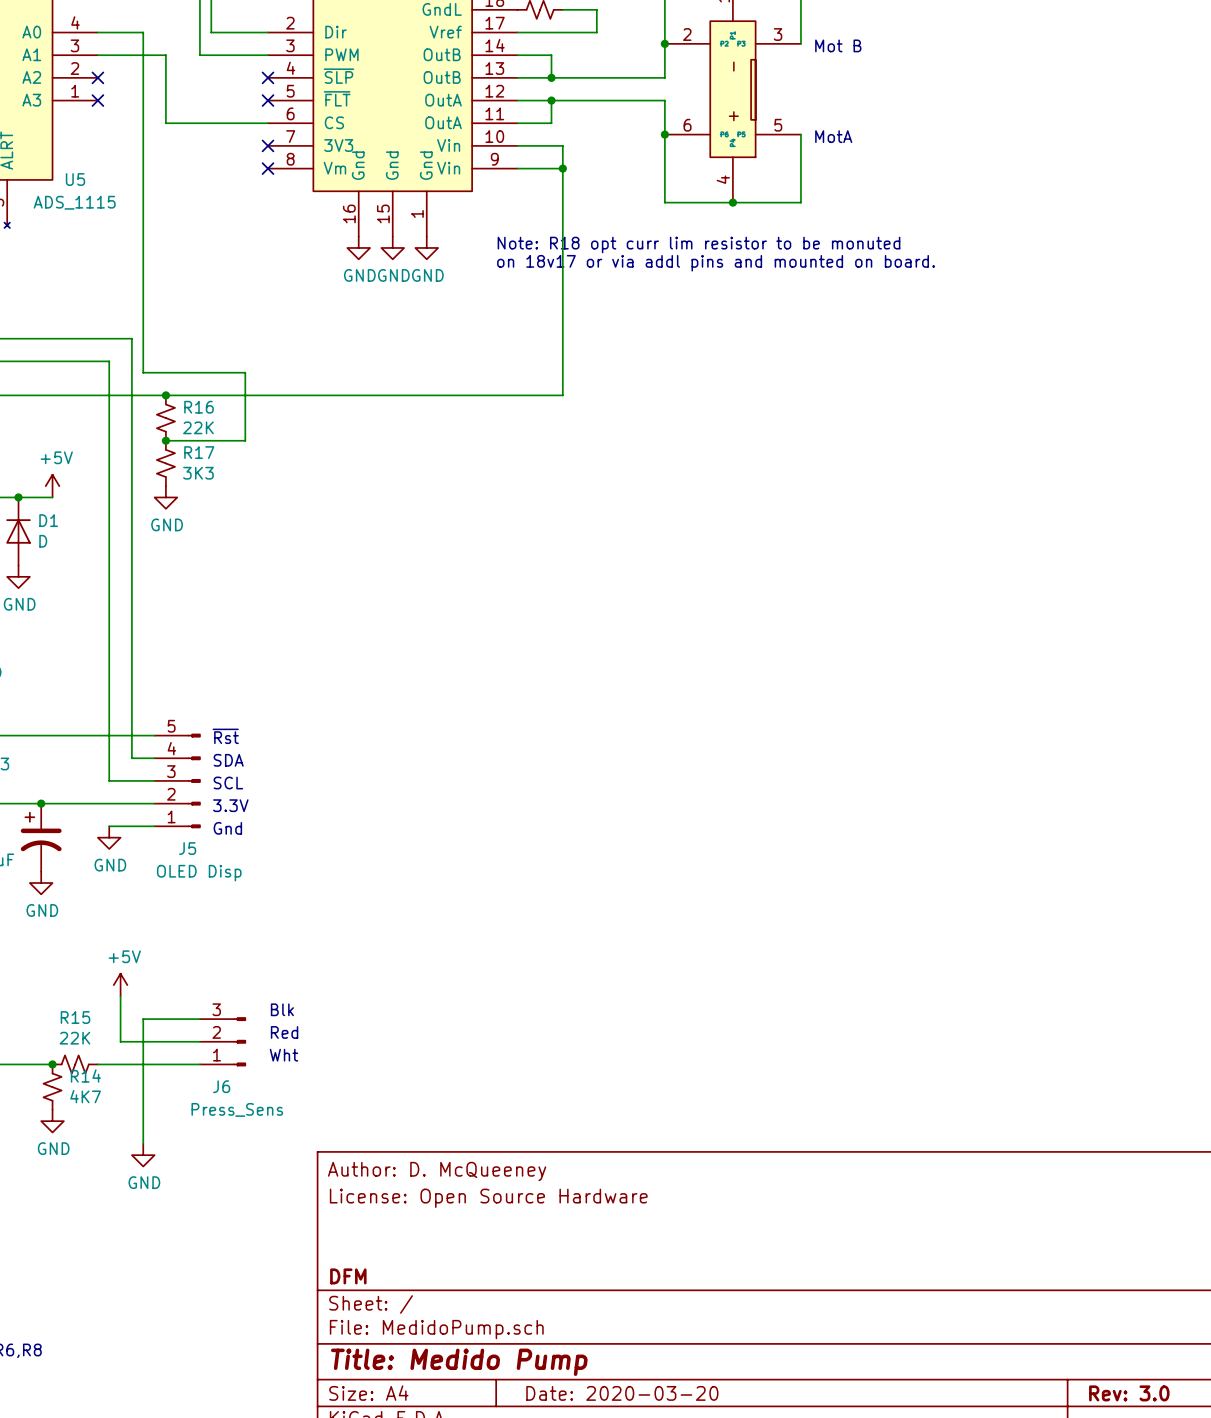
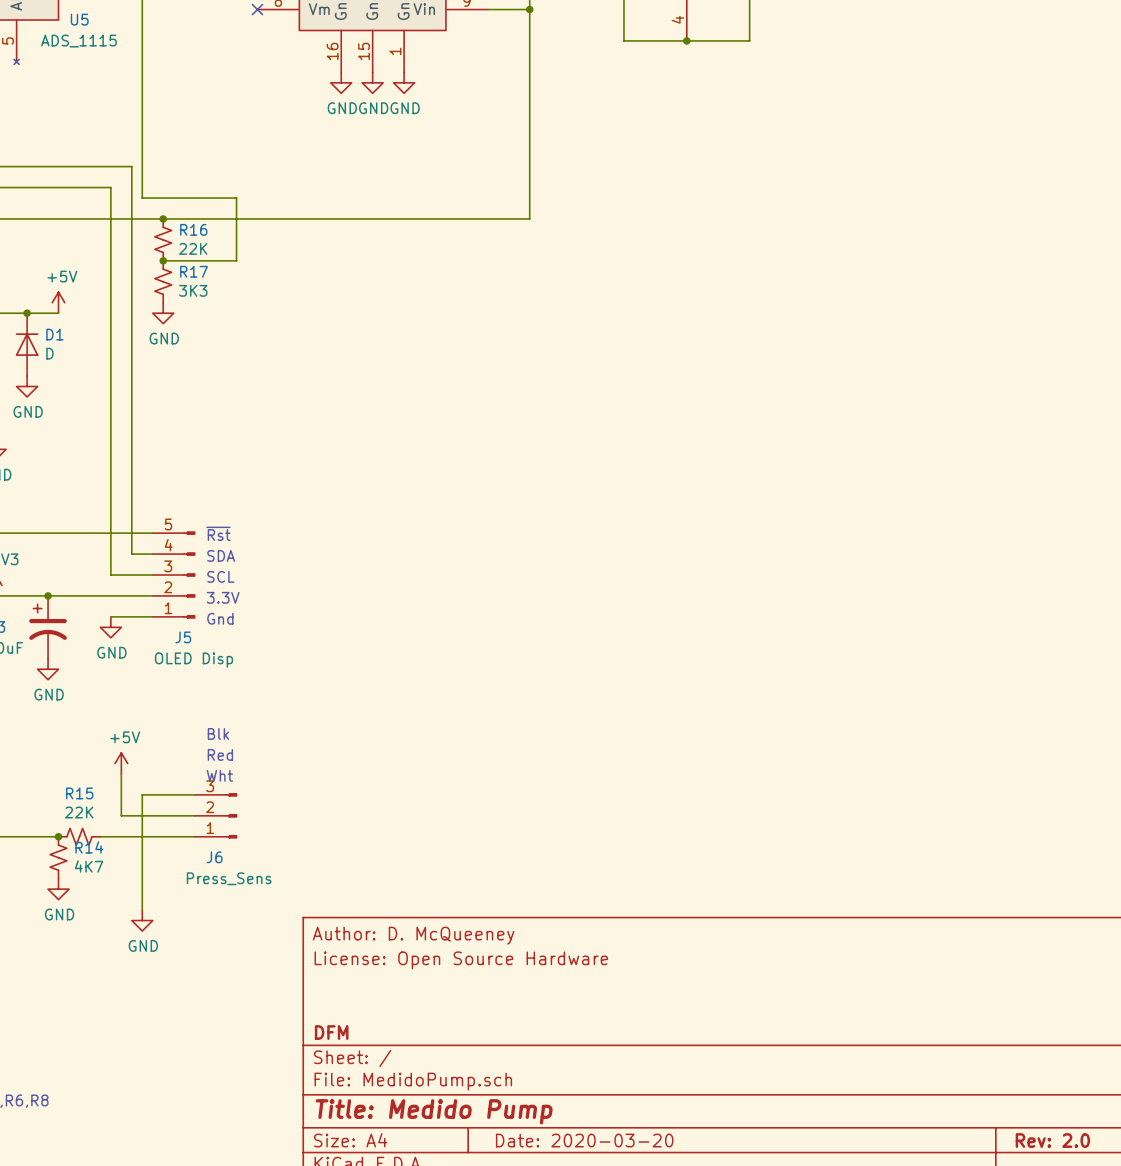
text: Note: R18 opt curr lim resistor to be monuted (698, 245) -> none
text: on 18v17 or via addl pins and mounted on board. (716, 263) -> none
text position: Blk (282, 1009) -> Blk (218, 733)
text position: Red (284, 1032) -> Red (220, 754)
text position: Wht (284, 1055) -> Wht (219, 775)
title block: Rev: 3.0 (1129, 1393) -> Rev: 2.0 (1052, 1140)

